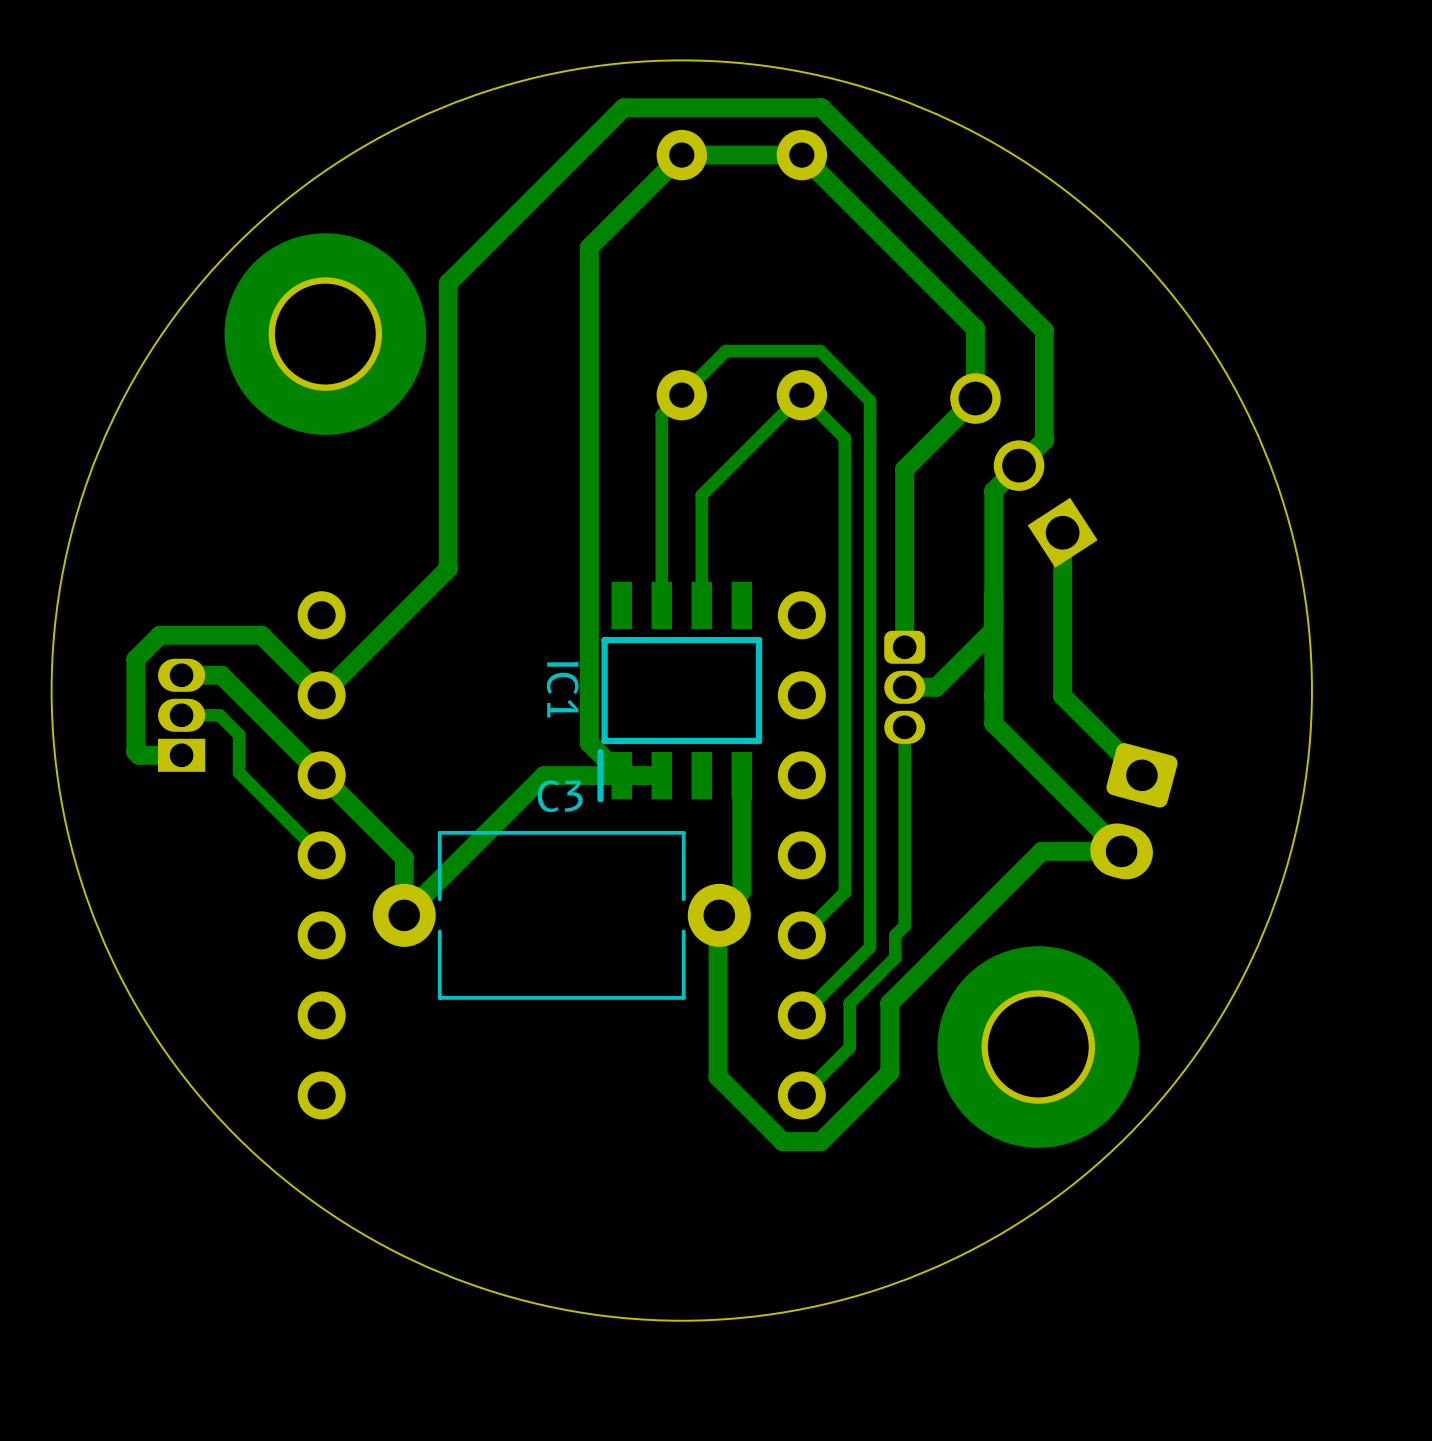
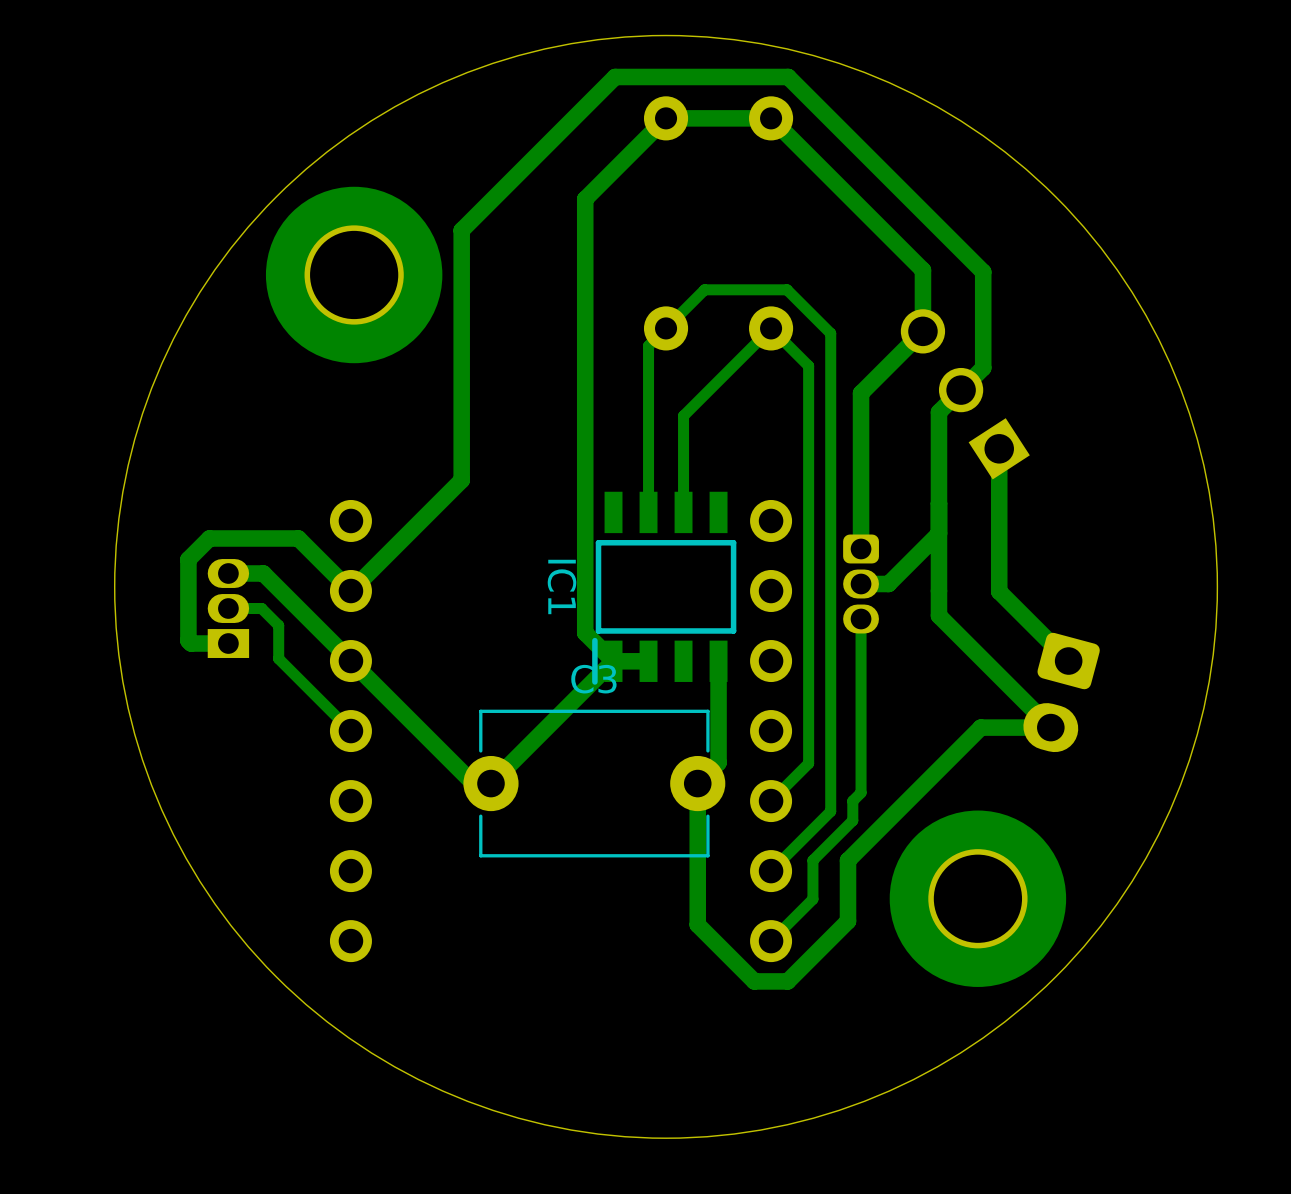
track: (621, 775) (543, 775) (404, 915) (404, 857) -> (613, 661) (490, 783) (473, 783) (423, 733)
C3 footprint: [372, 830, 751, 1000] -> [463, 709, 726, 858]

